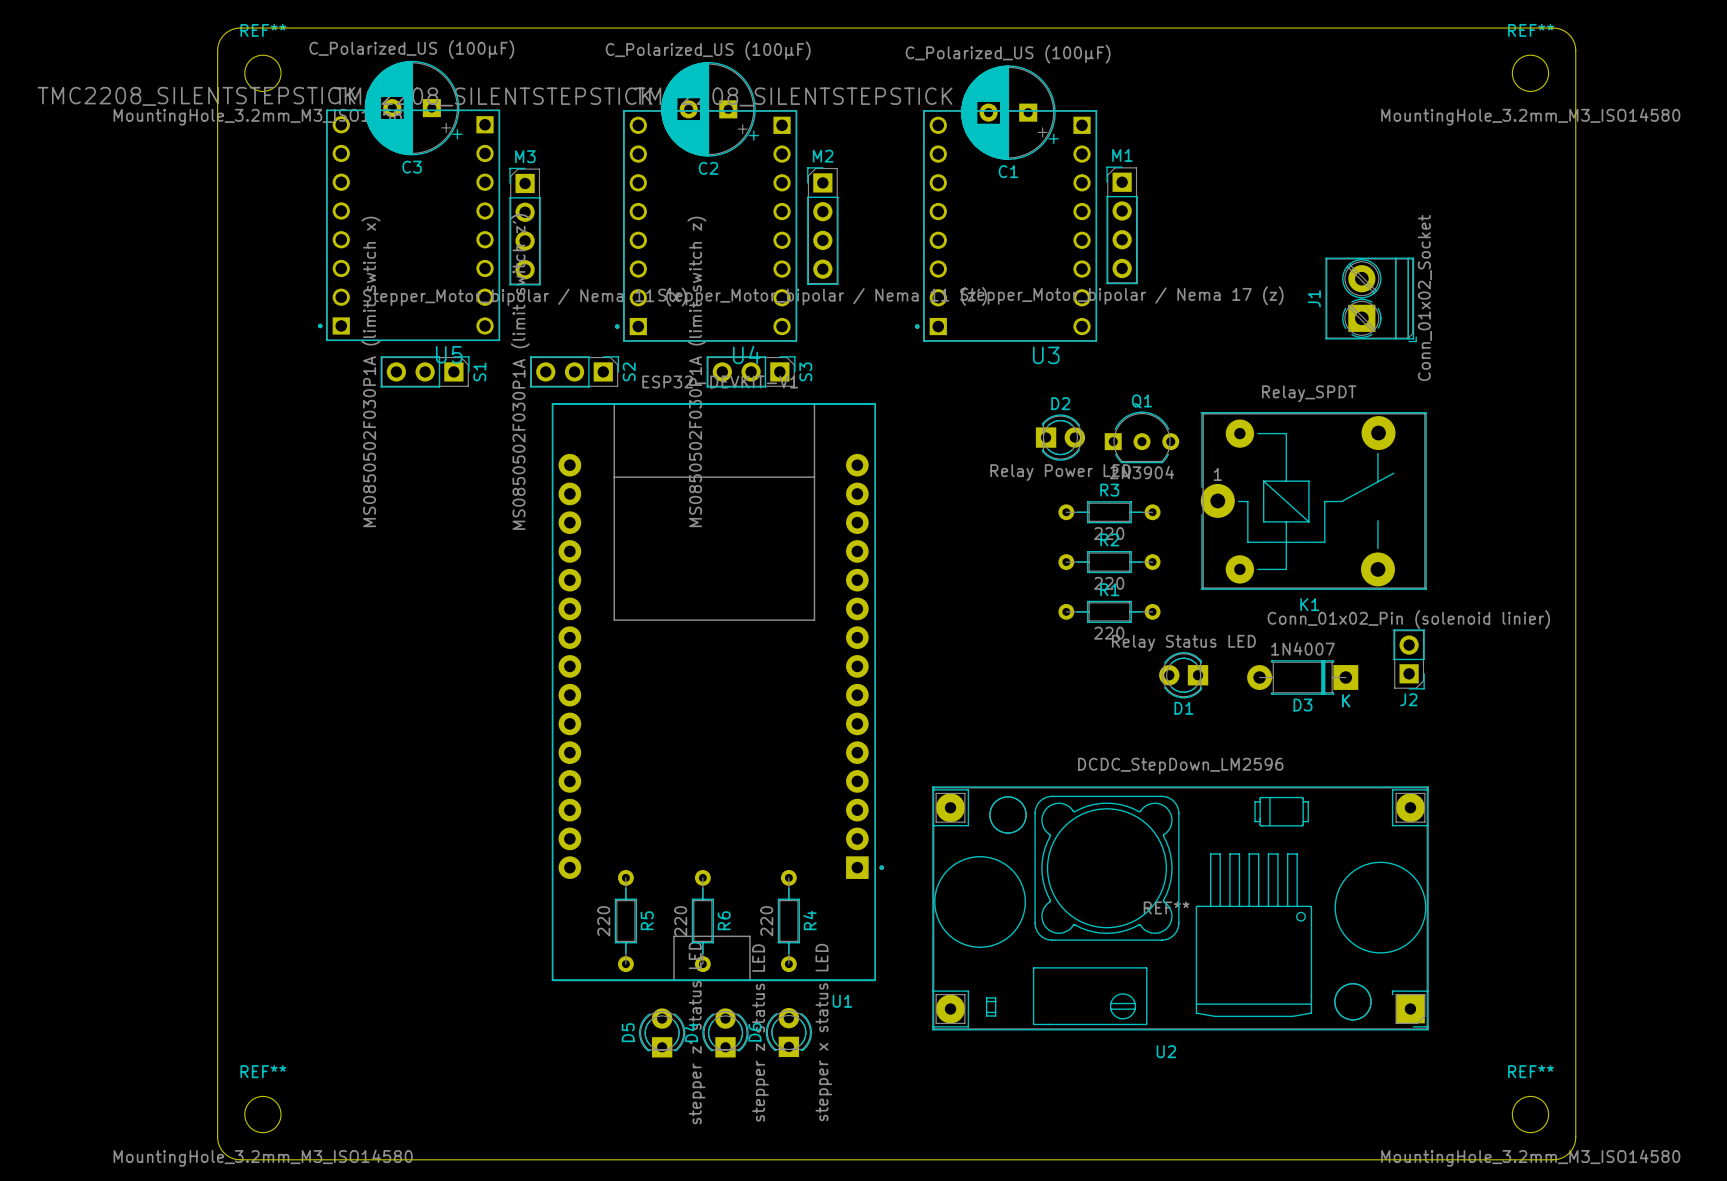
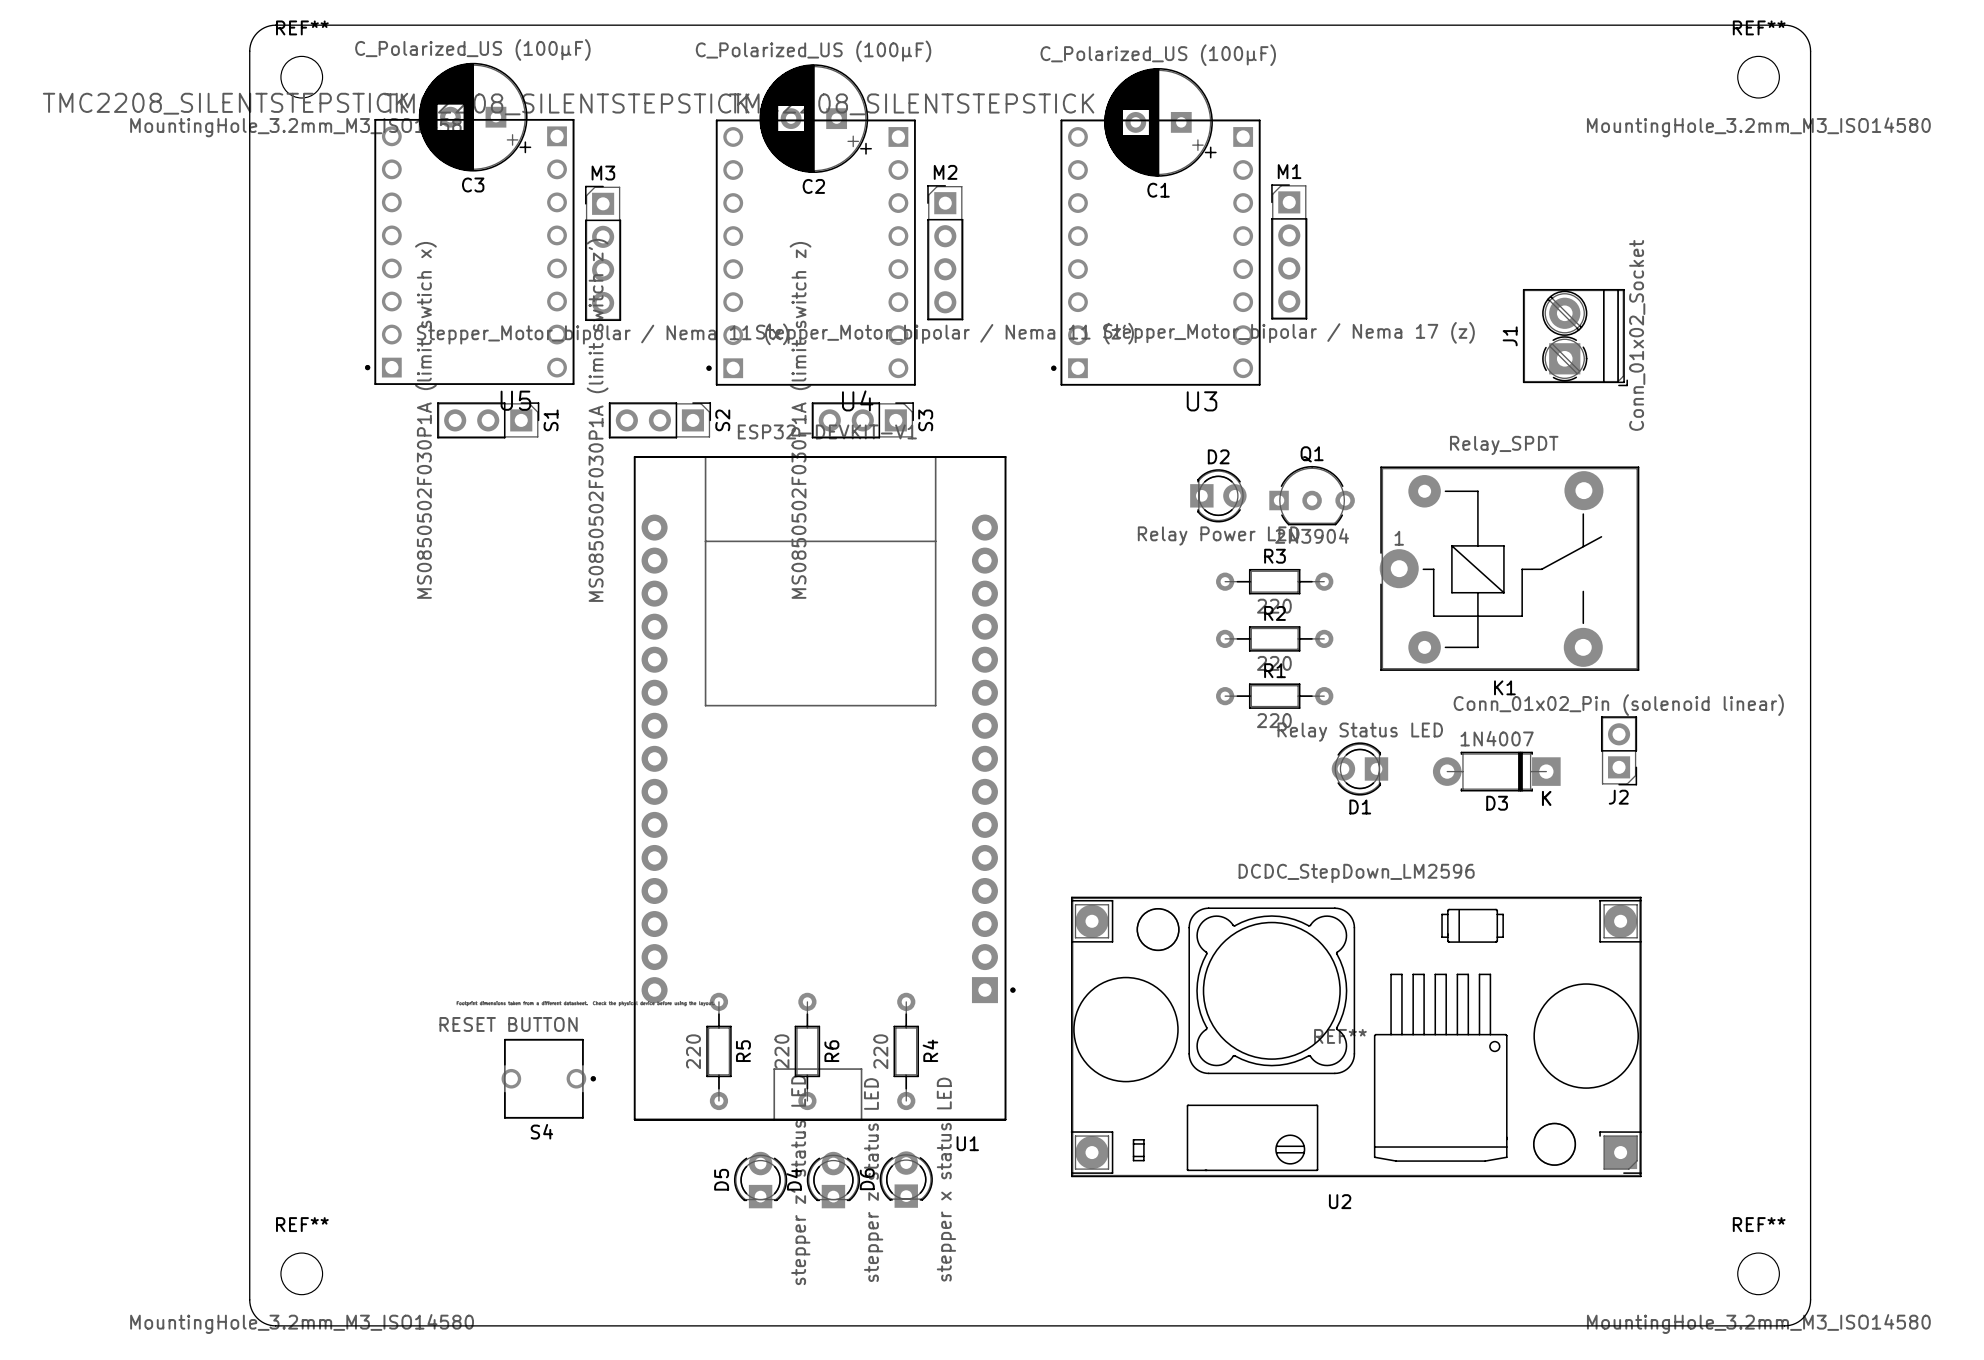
J2 value: Conn_01x02_Pin (solenoid linier) (1408, 619) -> Conn_01x02_Pin (solenoid linear) (1618, 705)
S4: none -> RESET BUTTON (548, 1078)

